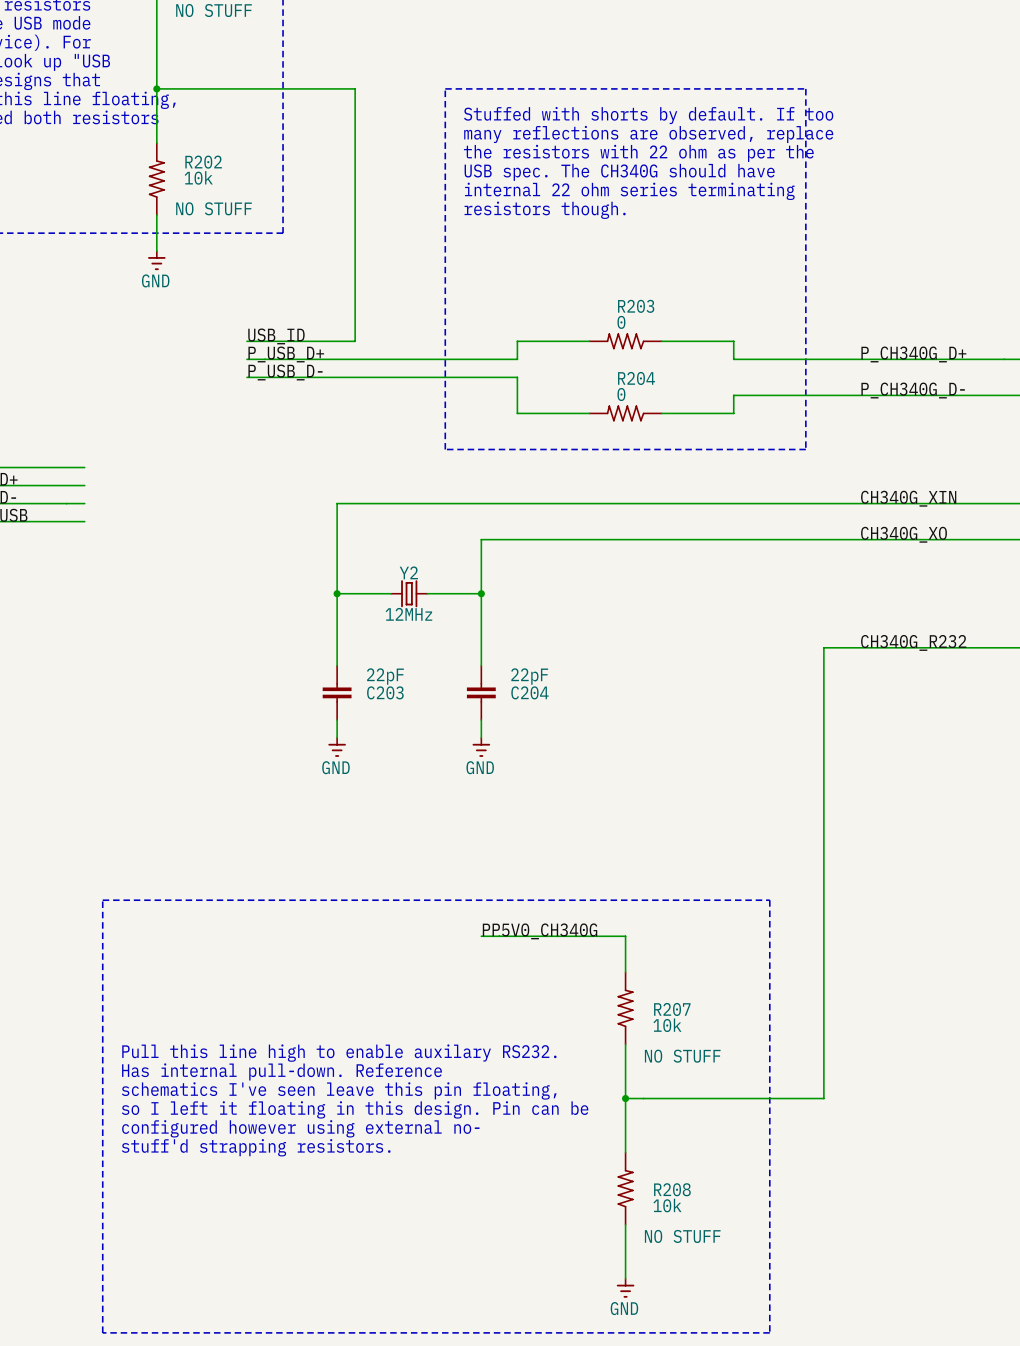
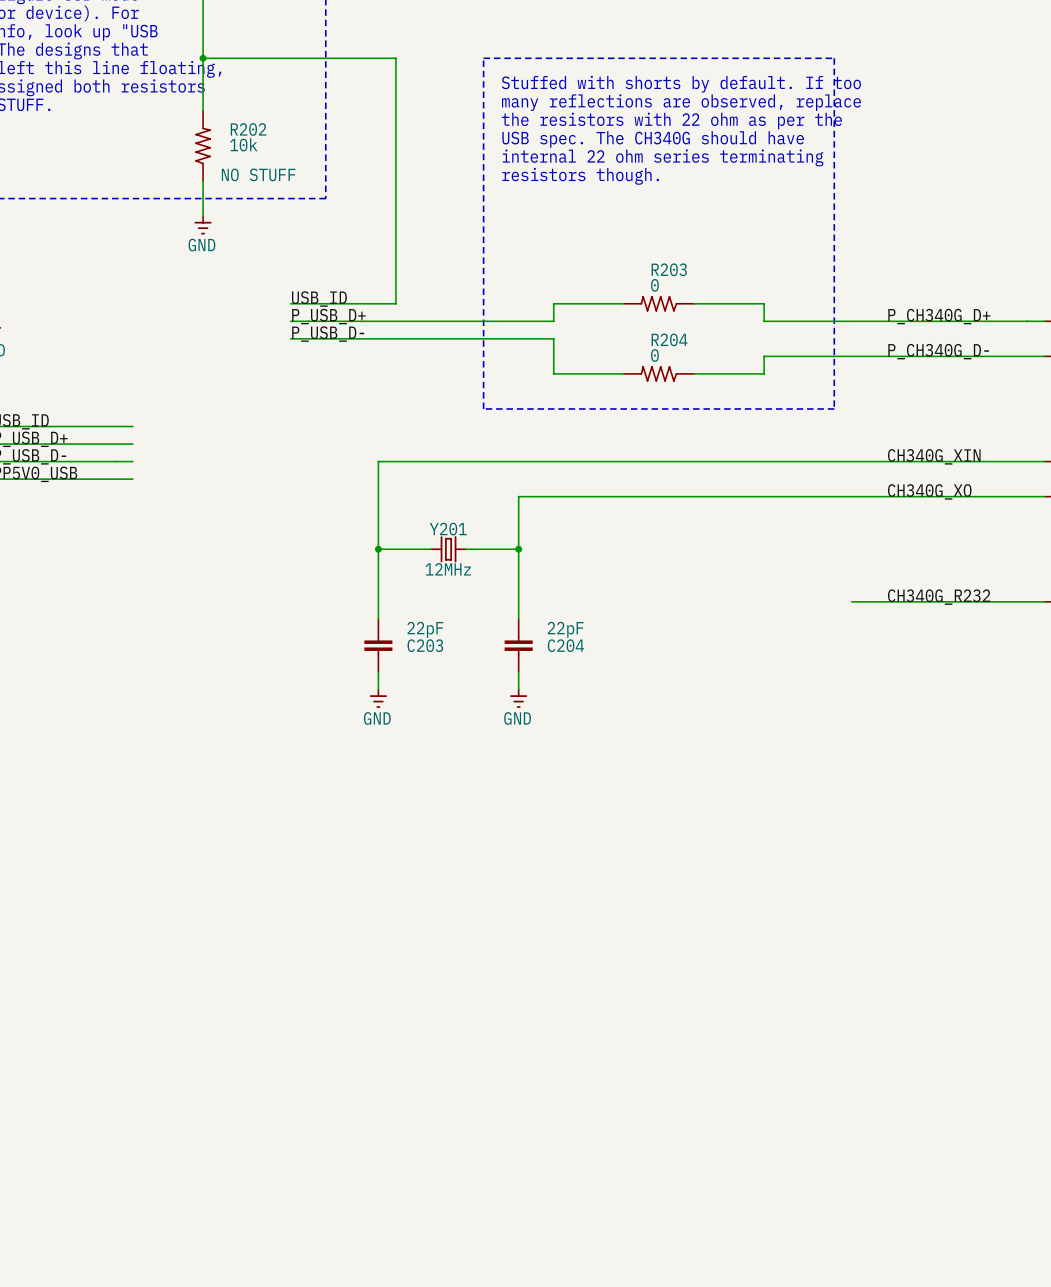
Y2 name: Y2 (408, 572) -> Y201 (448, 529)
wire: (823, 647) (823, 1098) (625, 1098) -> none
line: (102, 900) (102, 1332) (769, 1332) (769, 900) (102, 900) -> none
label: PP5V0_CH340G (540, 931) -> none
wire: (481, 936) (625, 936) (625, 972) -> none
R207: 10k (625, 1008) -> none
wire: (625, 1044) (625, 1152) -> none
text: Pull this line high to enable auxilary RS232. (339, 1053) -> none
text: Has internal pull-down. Reference (281, 1071) -> none
text: schematics I've seen leave this pin floating, (339, 1090) -> none
junction: (625, 1098) -> none
text: so I left it floating in this design. Pin can be (355, 1109) -> none
text: configured however using external no- (300, 1128) -> none
text: stuff'd strapping resistors. (256, 1147) -> none
R208: 10k (625, 1188) -> none
wire: (625, 1224) (625, 1278) -> none
power symbol: GND (625, 1288) -> none

